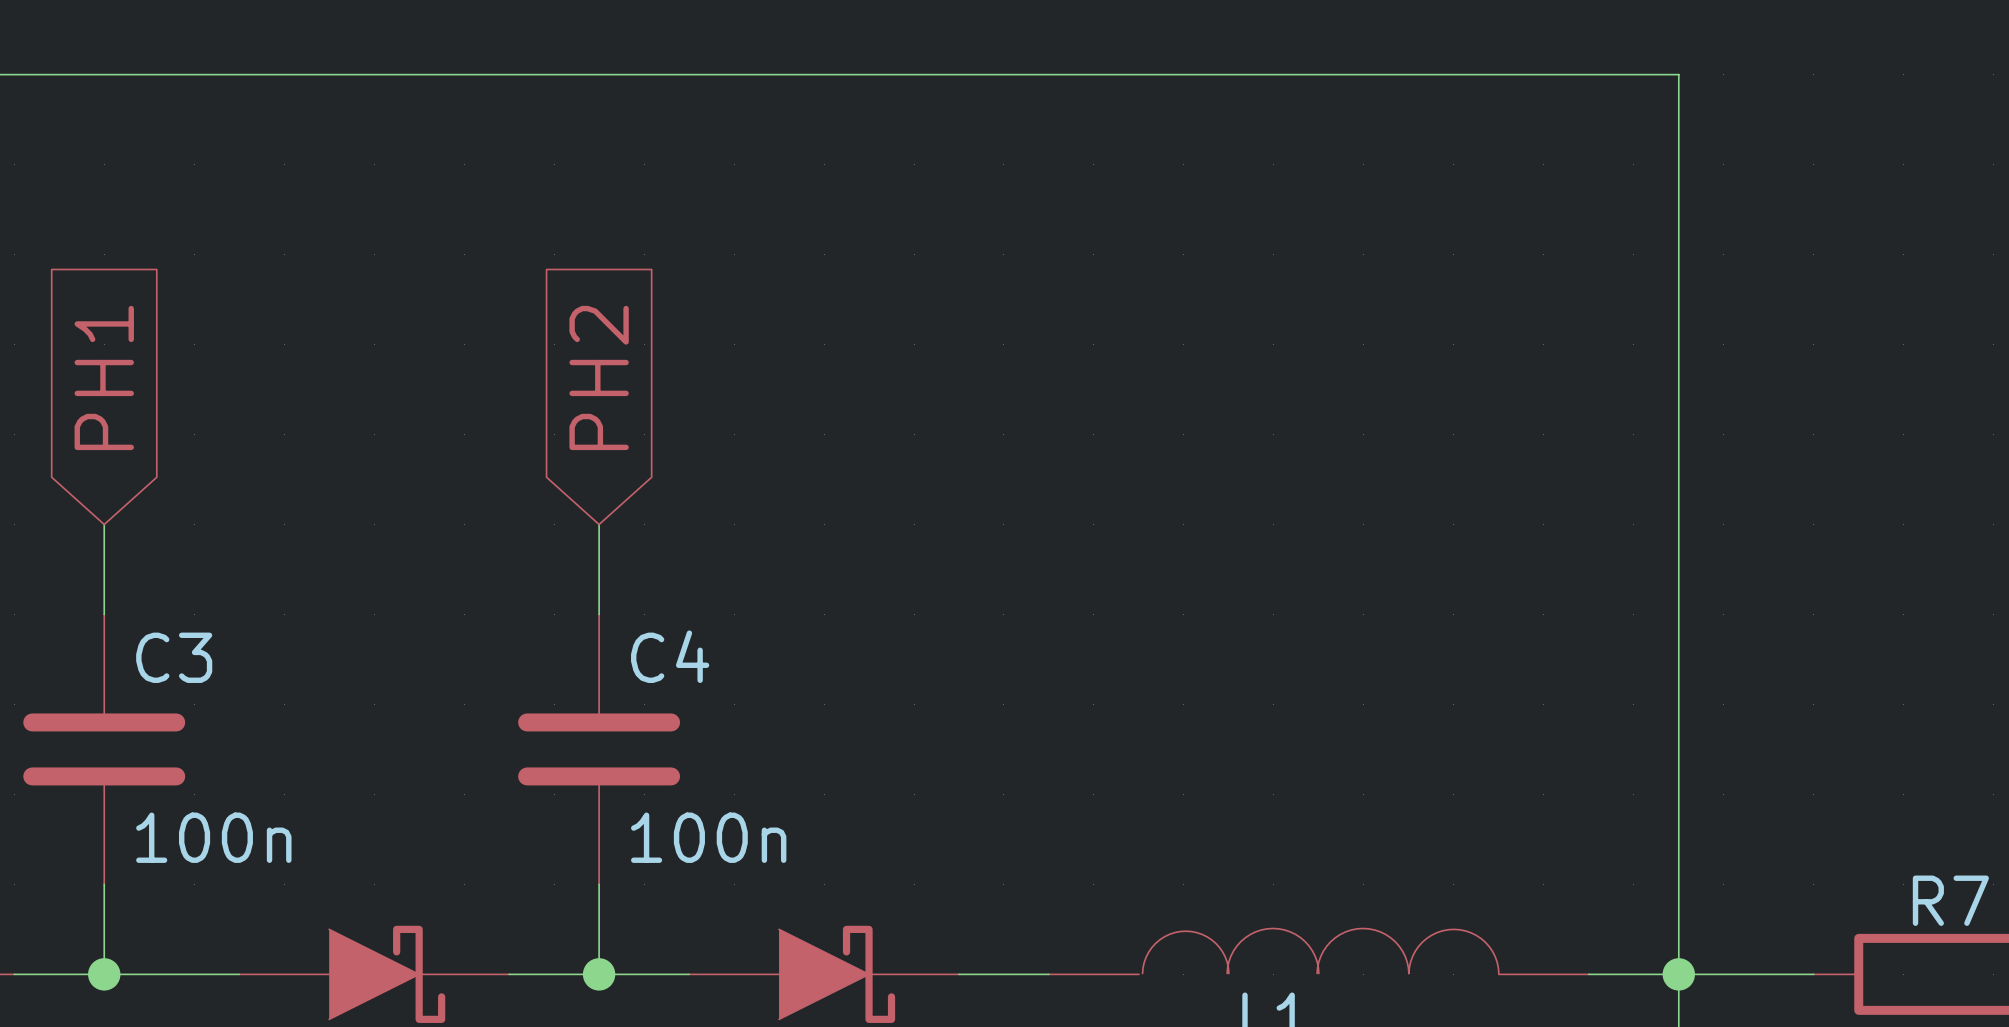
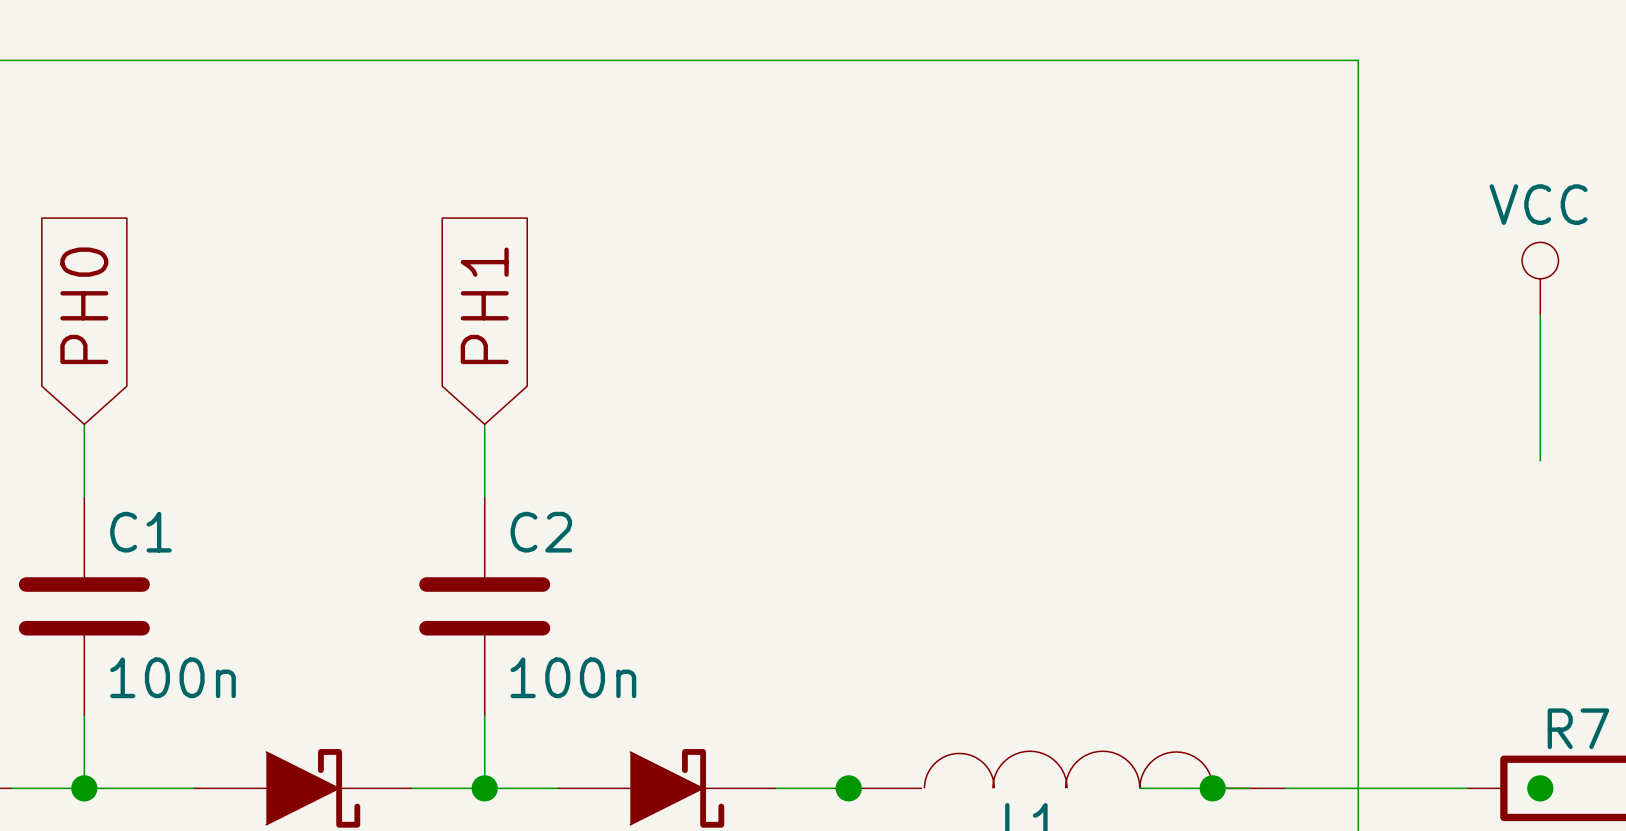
power symbol: none -> VCC (1540, 278)
global label: PH1 (104, 377) -> PH0 (84, 305)
global label: PH2 (599, 377) -> PH1 (484, 305)
wire: none -> (1540, 315) (1540, 460)
C4 name: C4 (670, 656) -> C2 (541, 532)
C3 name: C3 (174, 657) -> C1 (140, 532)
junction: none -> (848, 788)
wire: none -> (1139, 788) (1249, 788)
junction: none -> (1212, 788)
junction: (1678, 974) -> none
junction: none -> (1540, 788)

